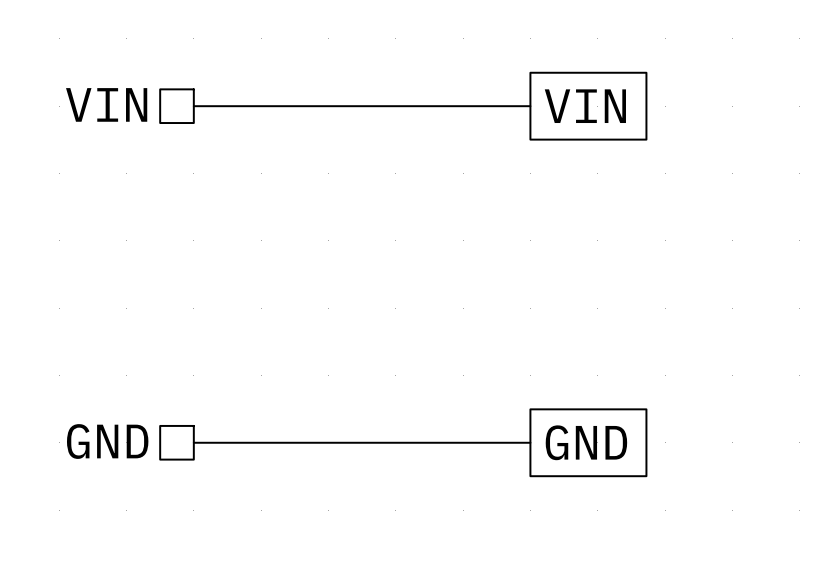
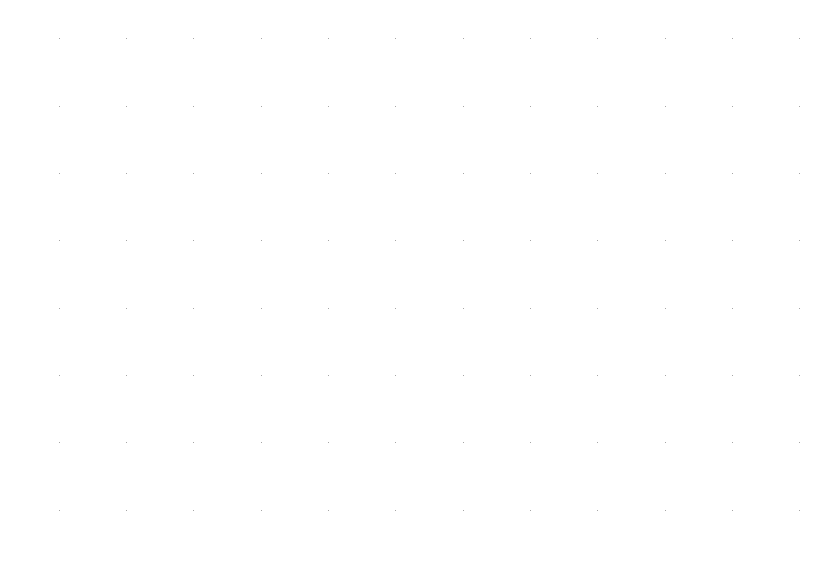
hierarchical label: VIN (106, 104) -> none
wire: (193, 106) (530, 106) -> none
global label: VIN (585, 106) -> none
hierarchical label: GND (107, 441) -> none
wire: (193, 442) (530, 442) -> none
global label: GND (586, 442) -> none

